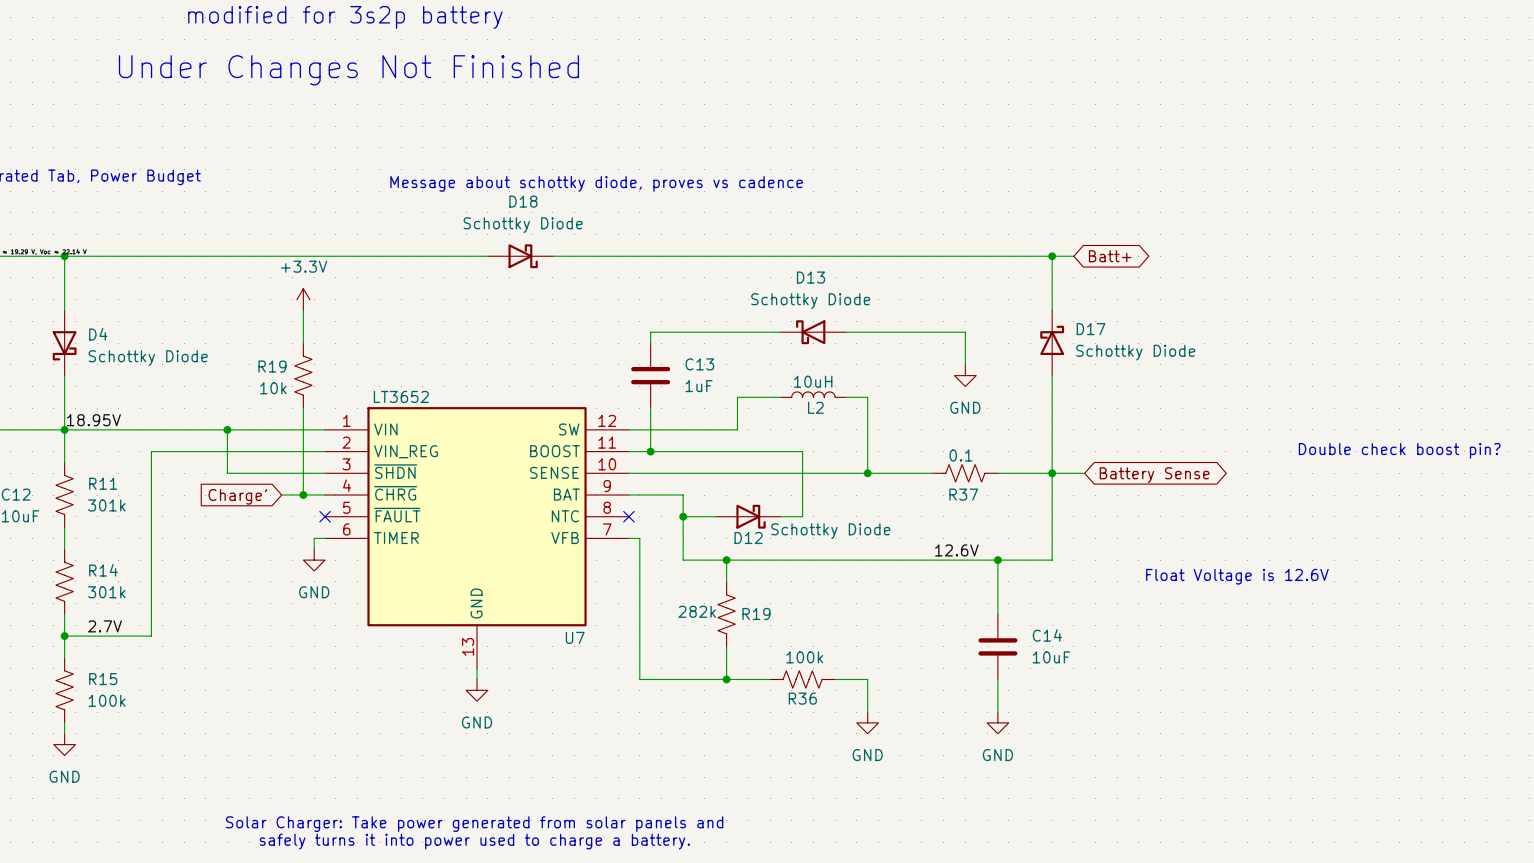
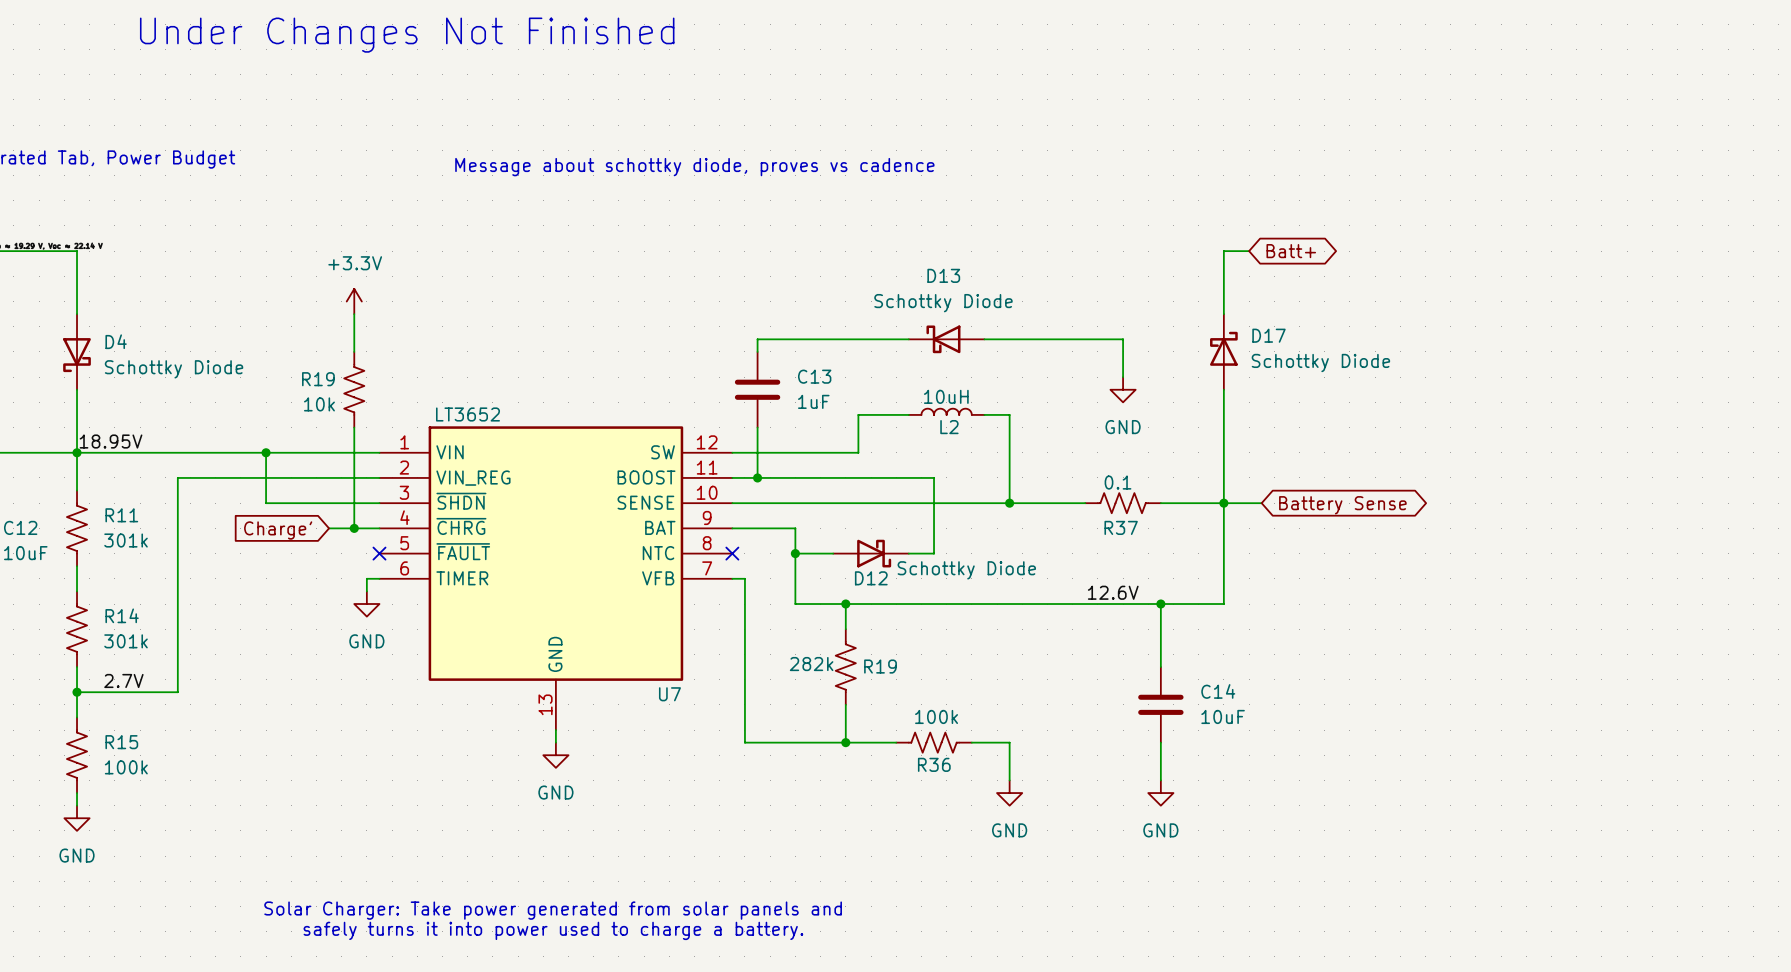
wire: (64, 256) (487, 256) -> none
junction: (64, 256) -> none
D18: Schottky Diode (520, 256) -> none
wire: (552, 256) (1052, 256) -> none
junction: (1052, 256) -> none
text: Double check boost pin? (1399, 450) -> none
text: Float Voltage is 12.6V (1237, 576) -> none

